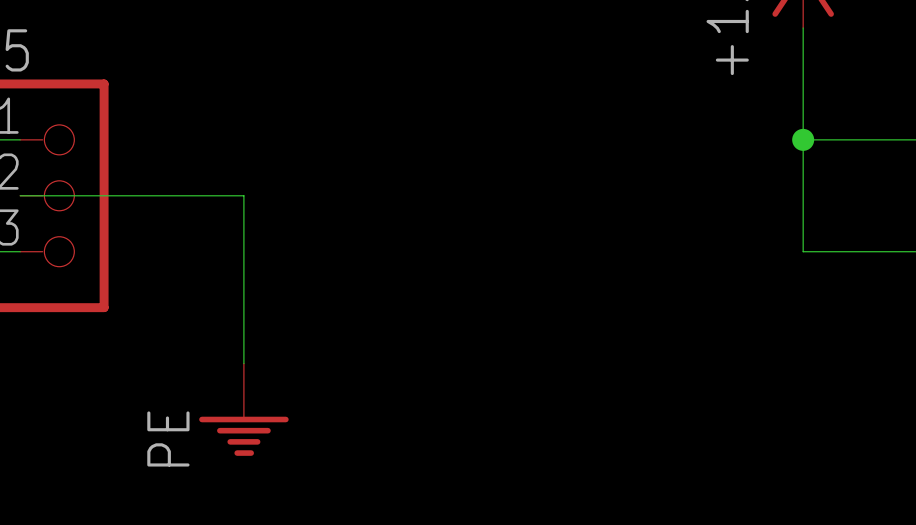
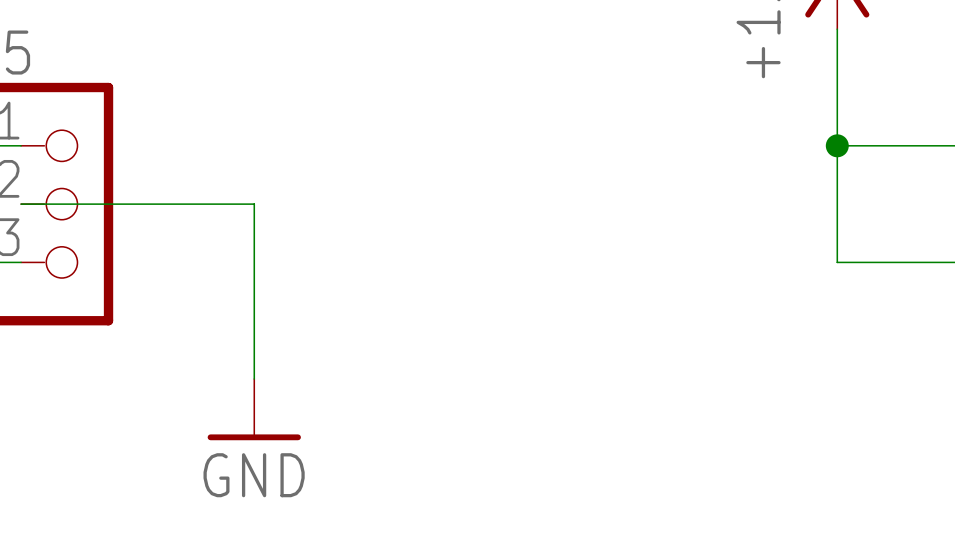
power symbol: PE (243, 409) -> GND (254, 409)

